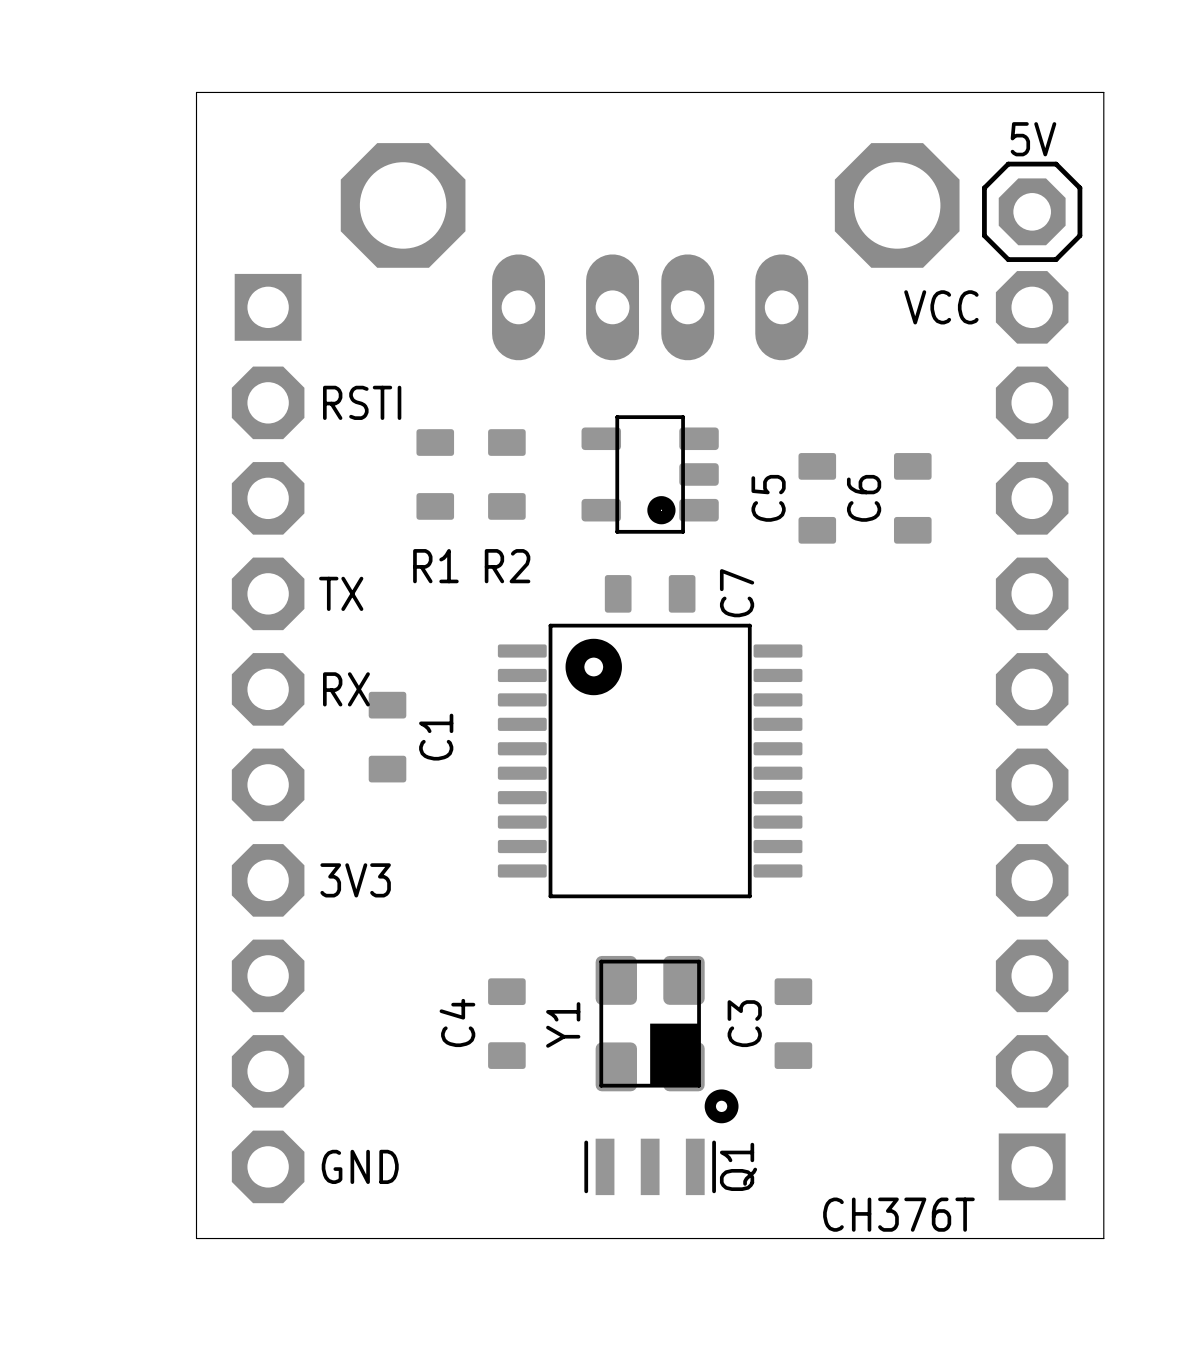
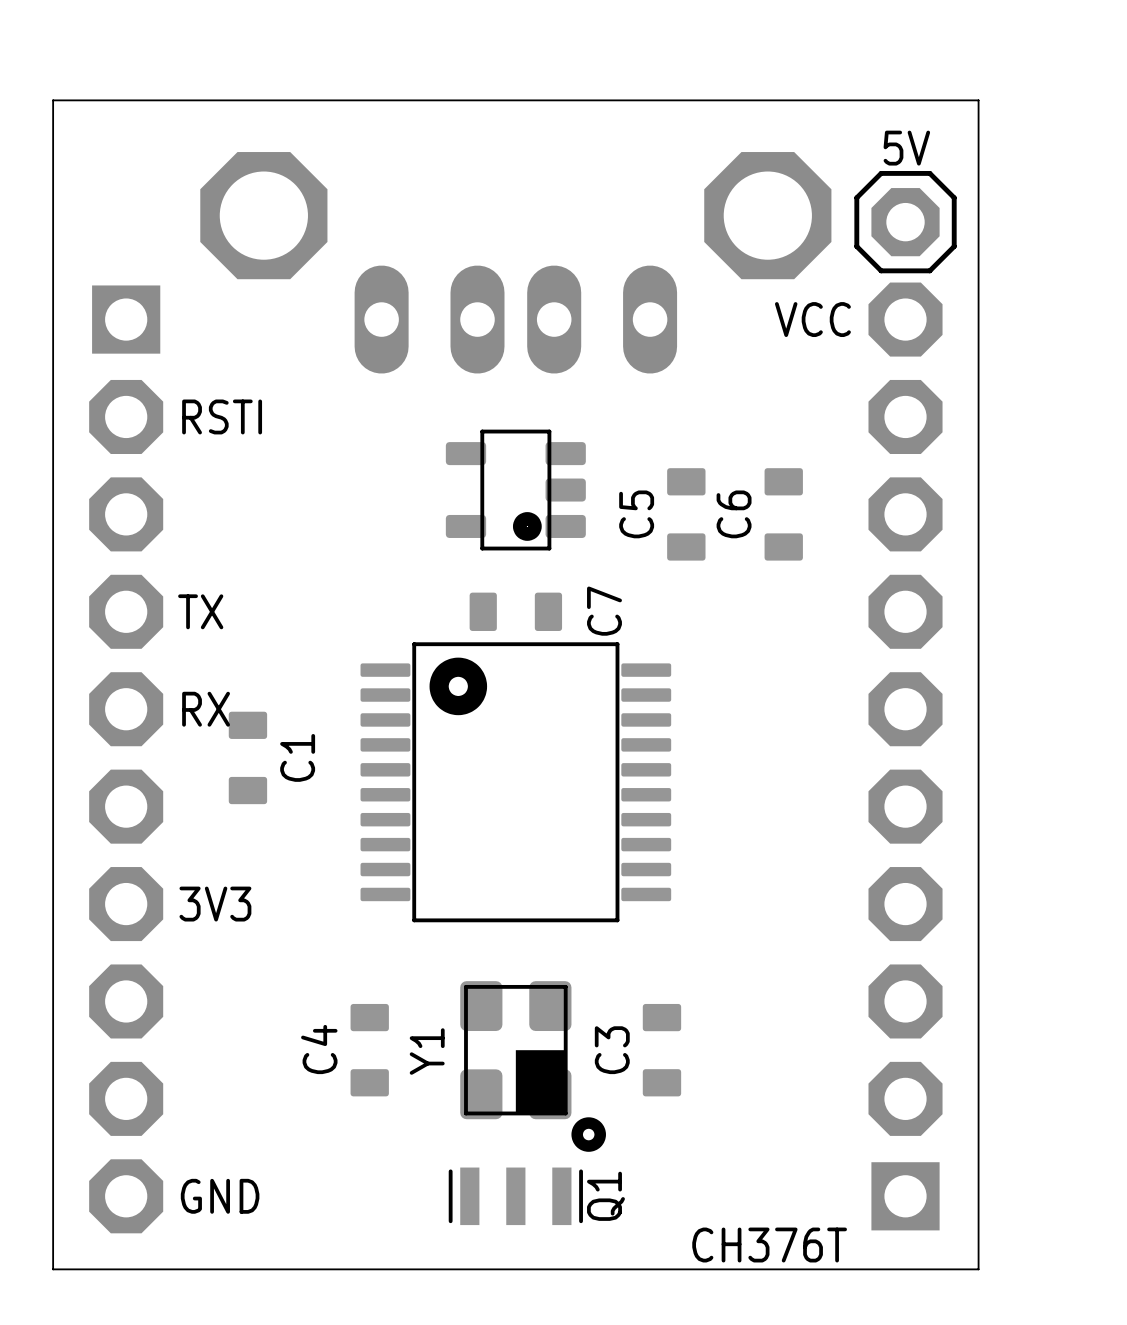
R1: (435, 474) -> none
R2: (506, 474) -> none

